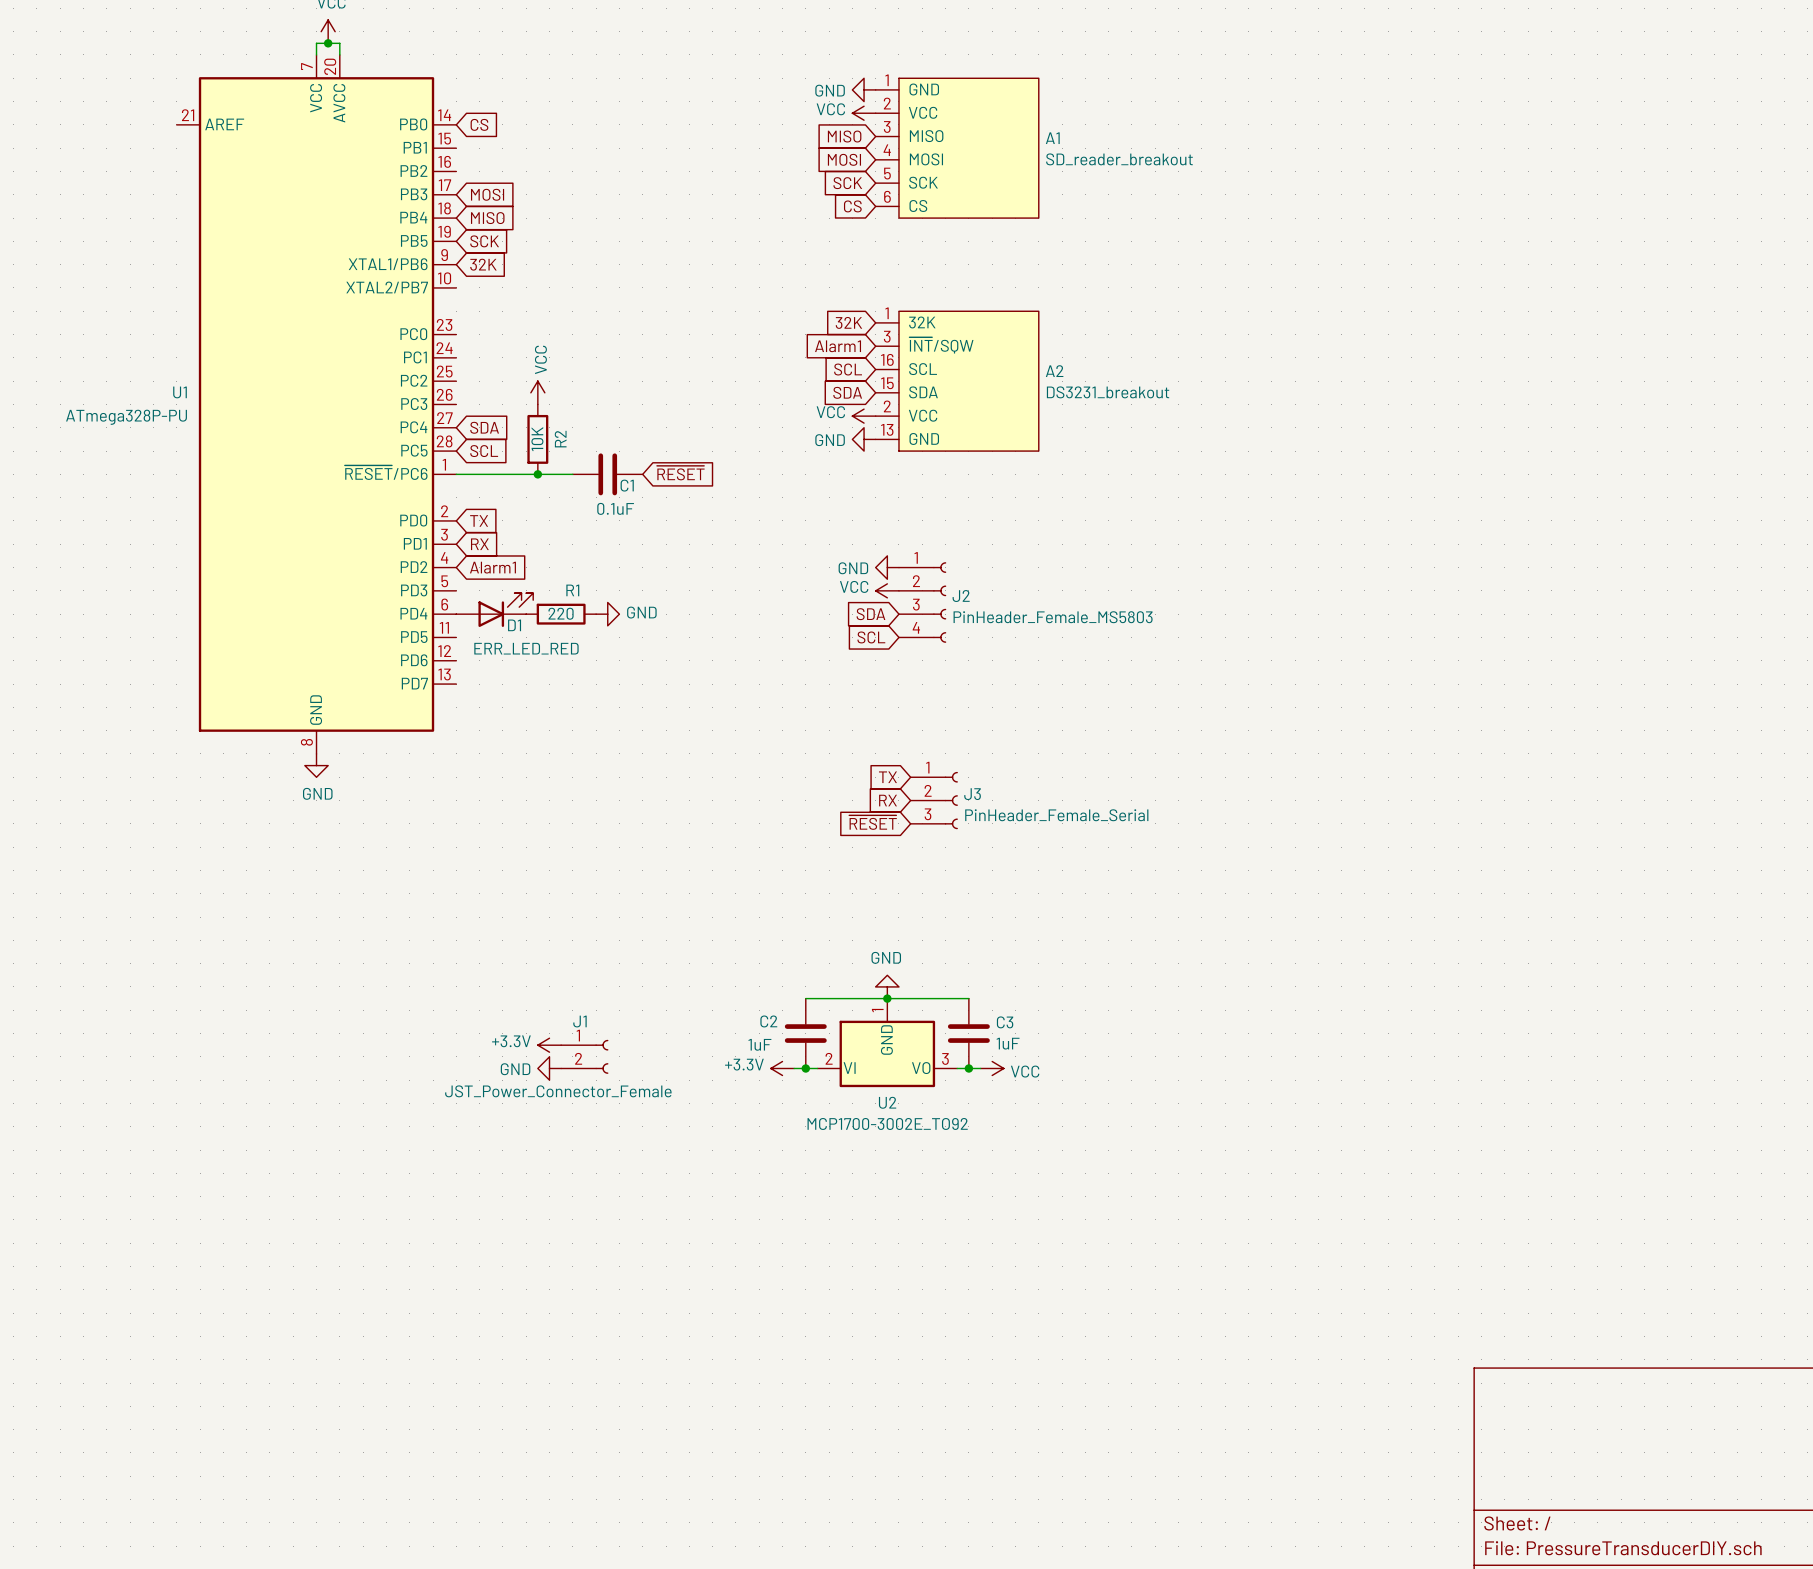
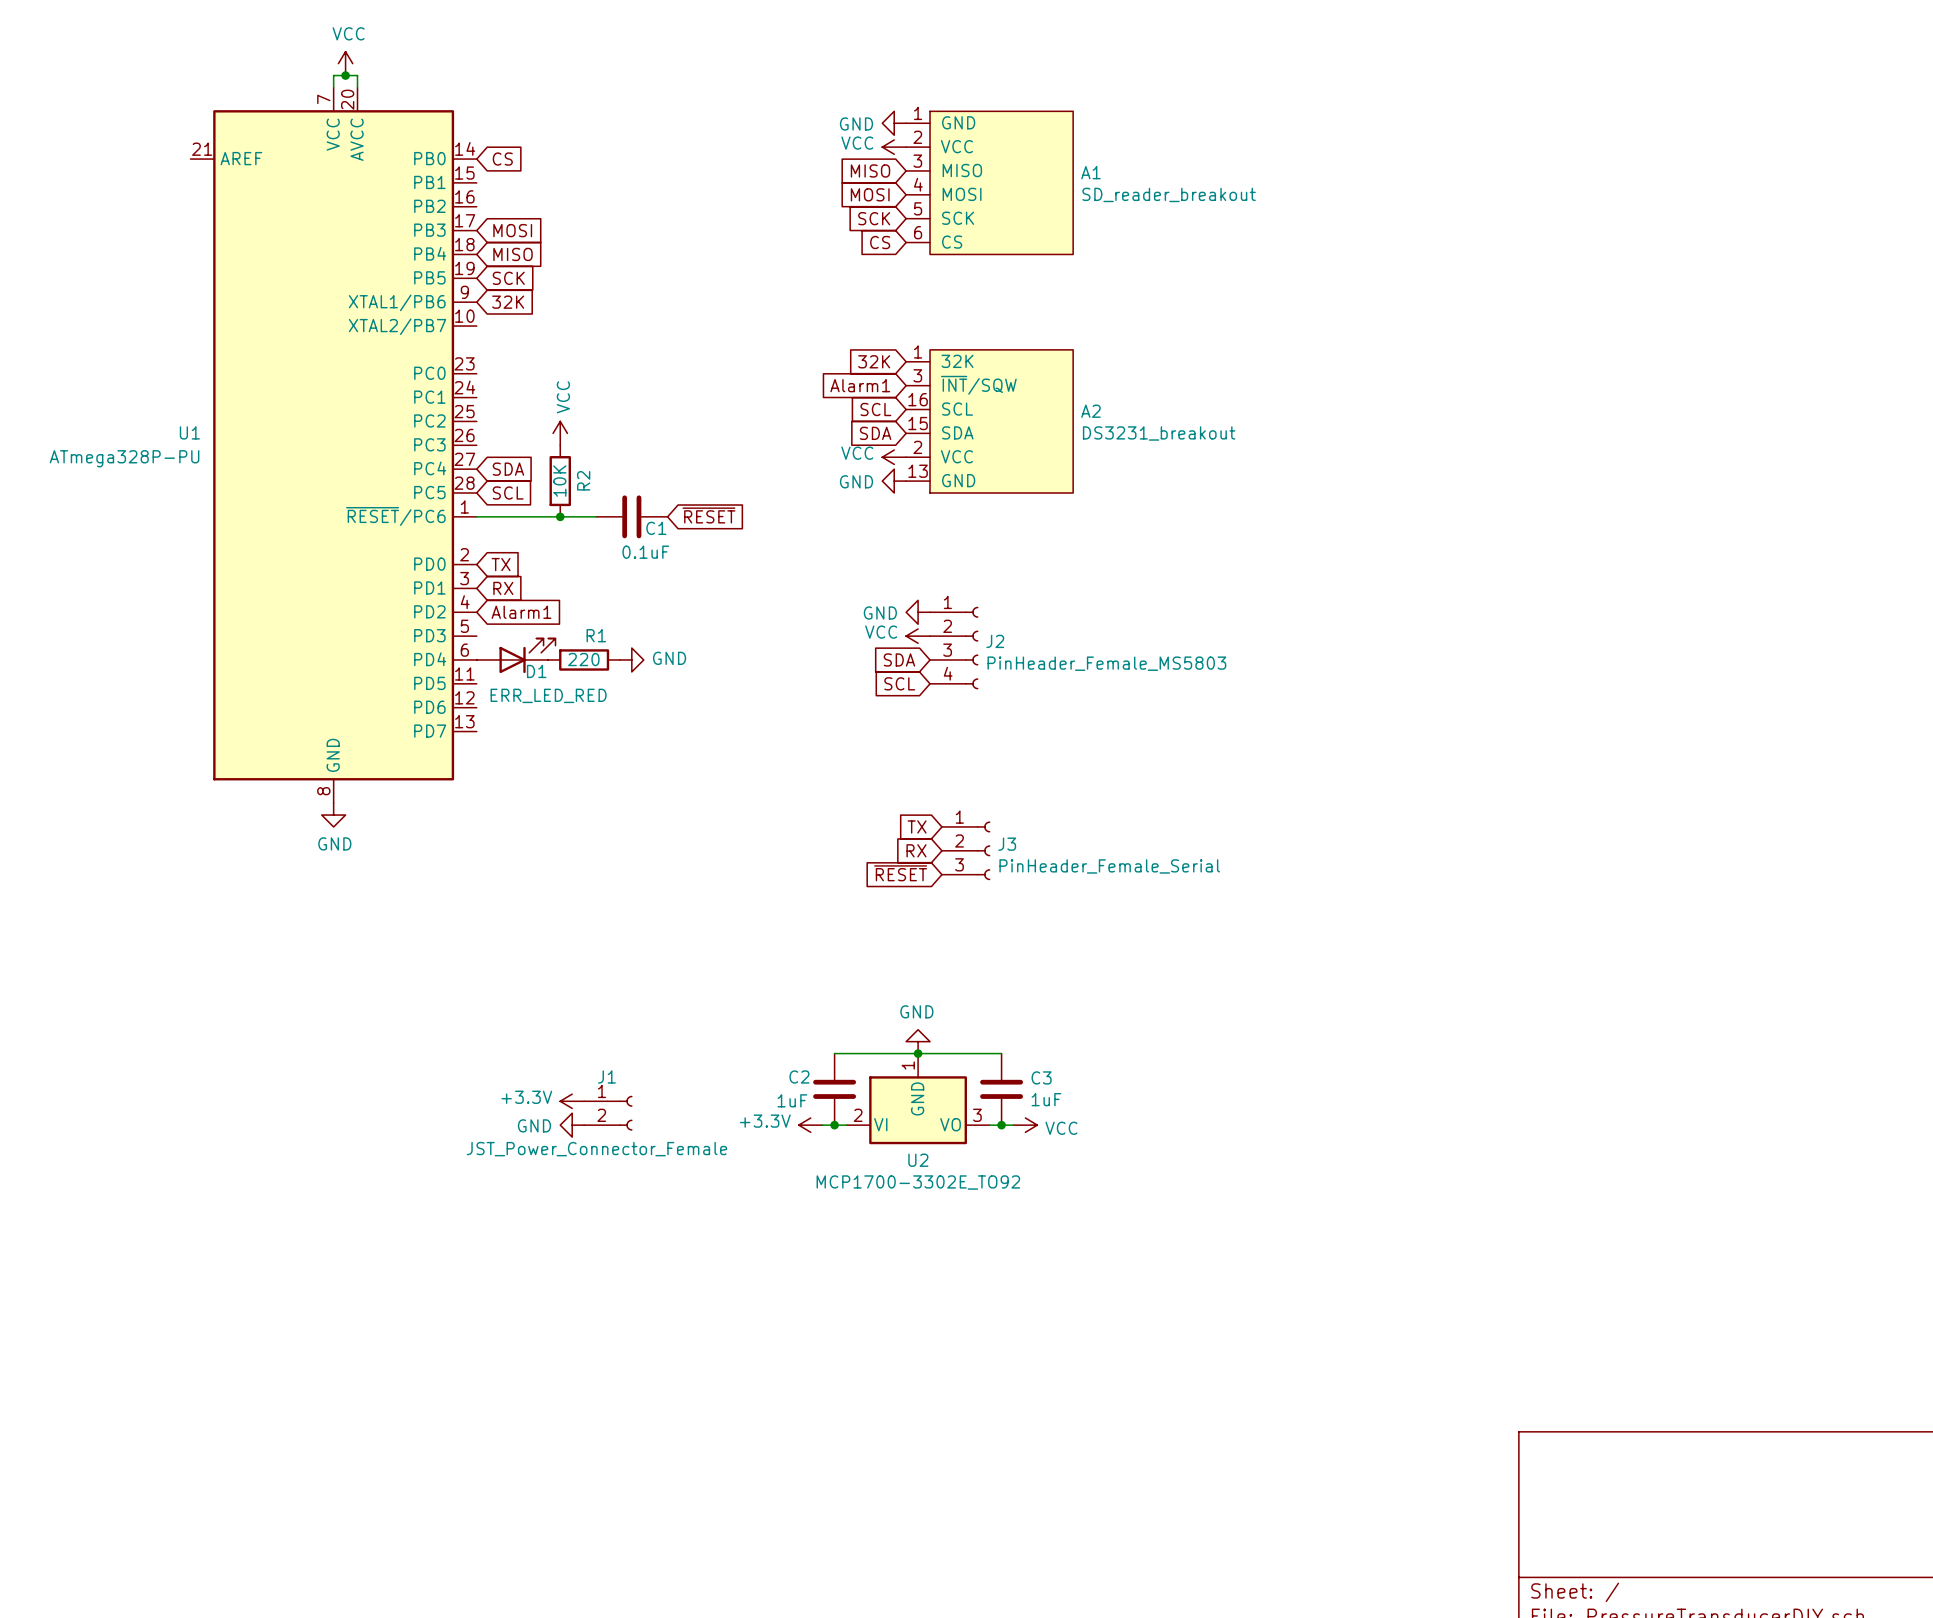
U2 value: MCP1700-3002E_TO92 (887, 1123) -> MCP1700-3302E_TO92 (918, 1182)

